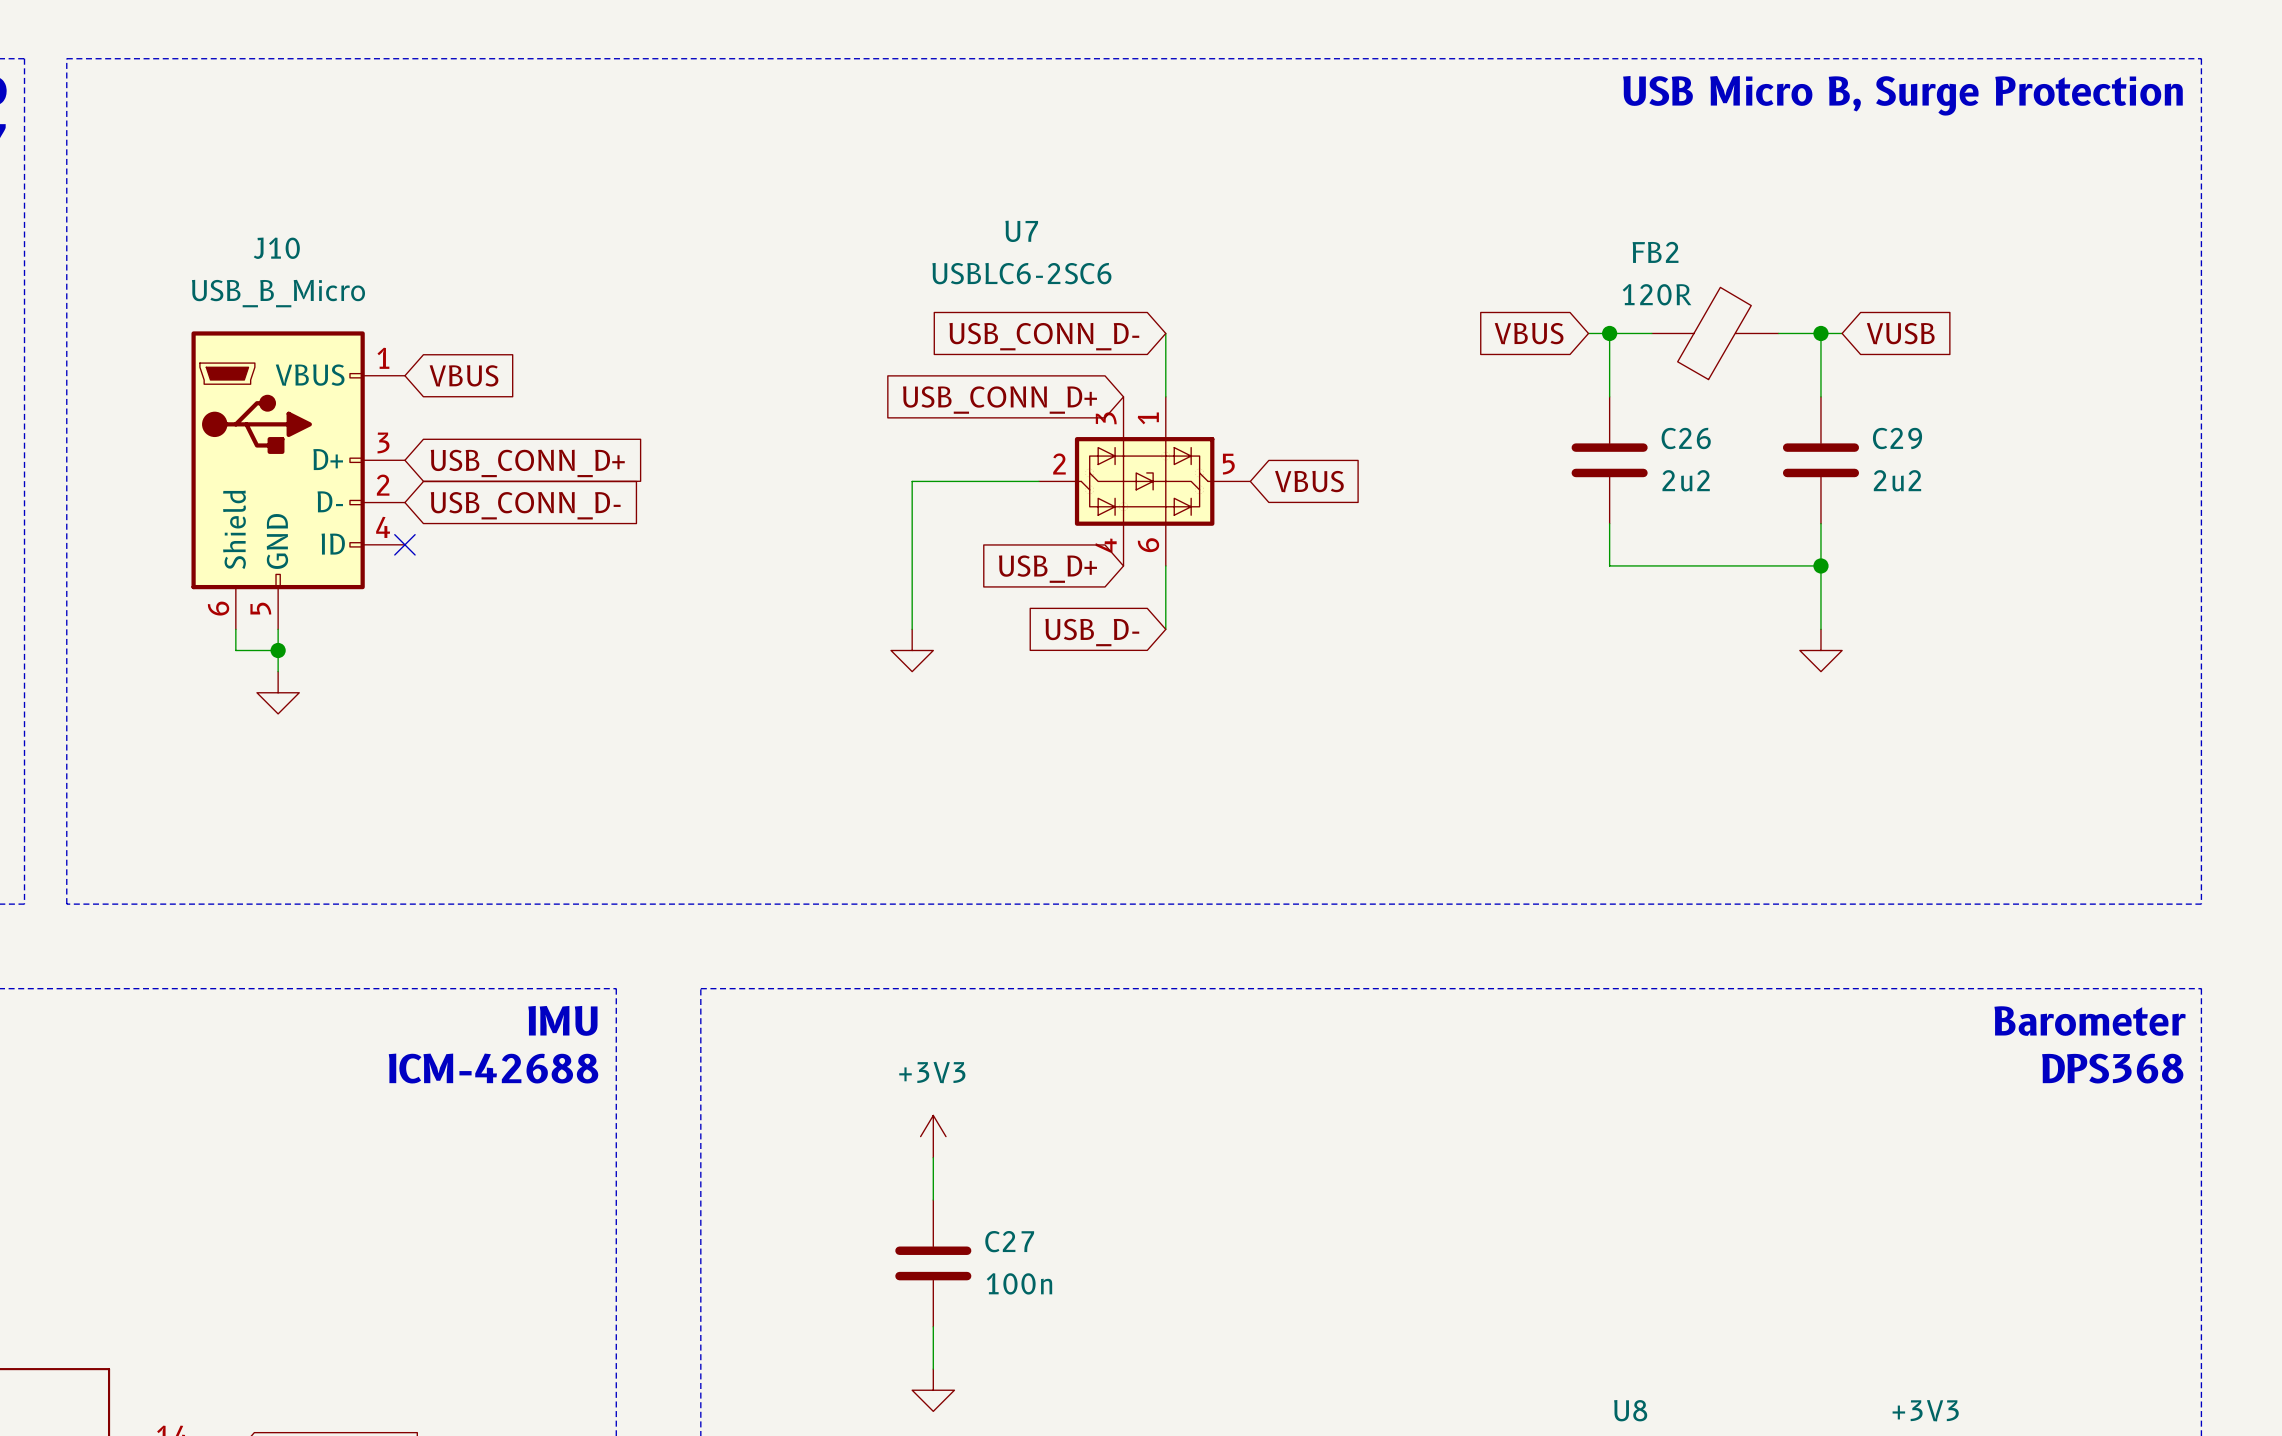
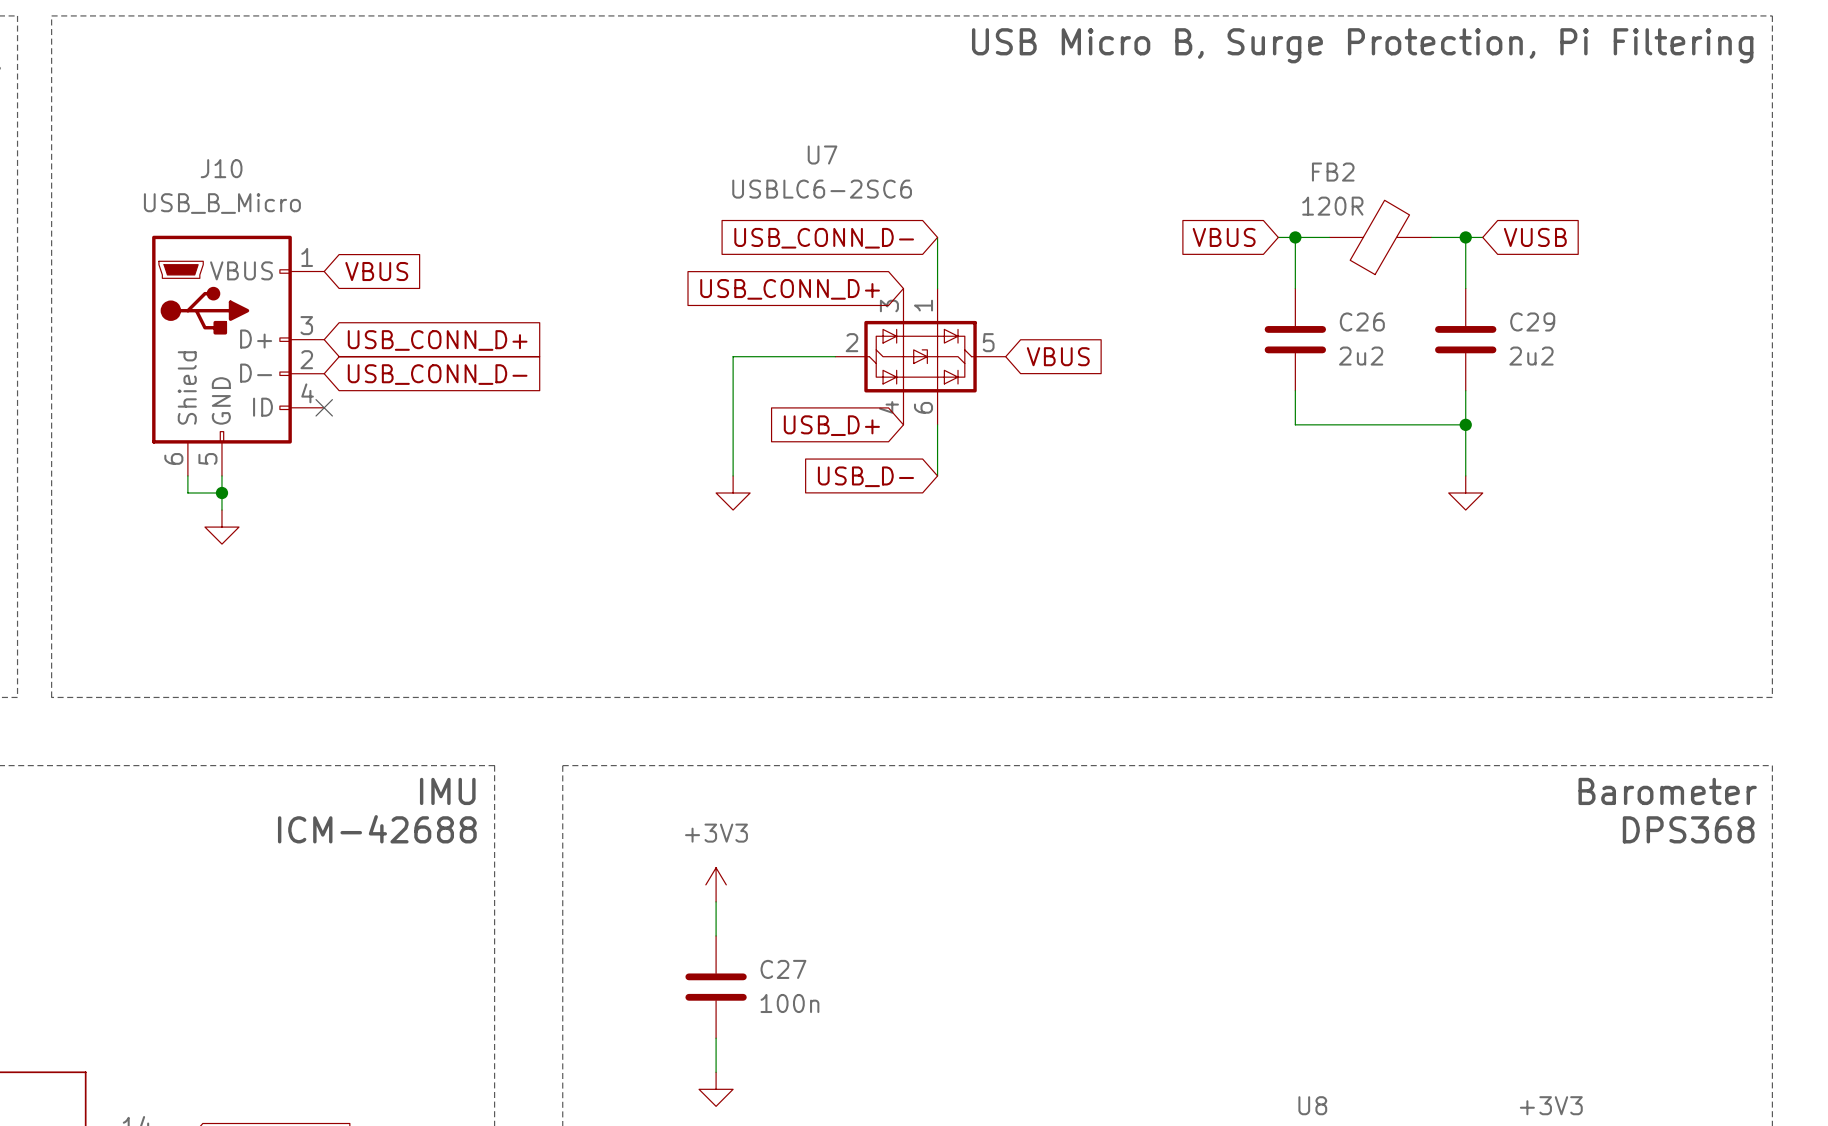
text: USB Micro B, Surge Protection (1902, 95) -> USB Micro B, Surge Protection, Pi Filtering (1362, 45)
power symbol position: +3V3 (933, 1136) -> +3V3 (716, 884)
wire: (933, 1157) (933, 1200) -> (716, 901) (716, 935)
C27 position: (933, 1263) -> (716, 987)
wire: (933, 1326) (933, 1369) -> (716, 1038) (716, 1072)
power symbol position: (933, 1390) -> (716, 1089)

